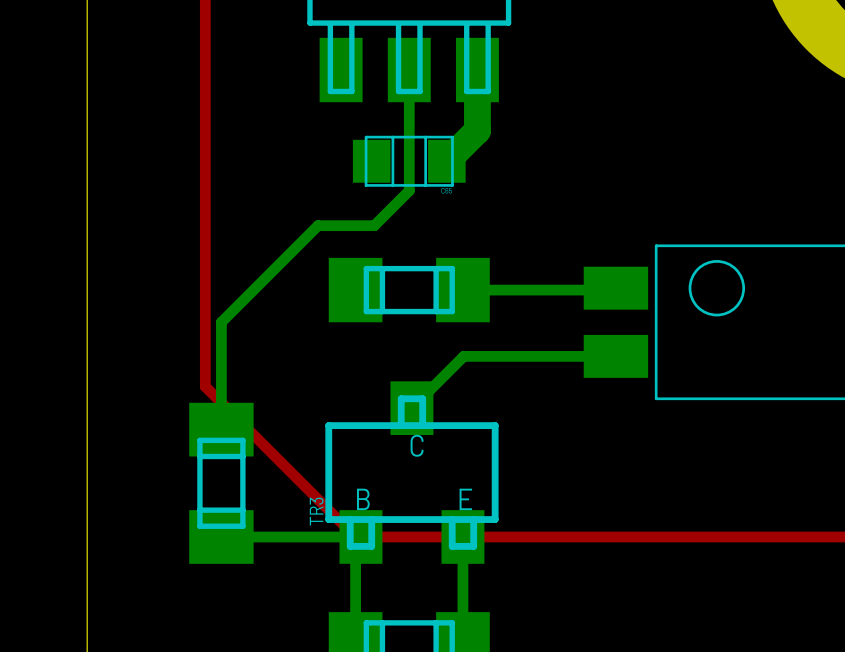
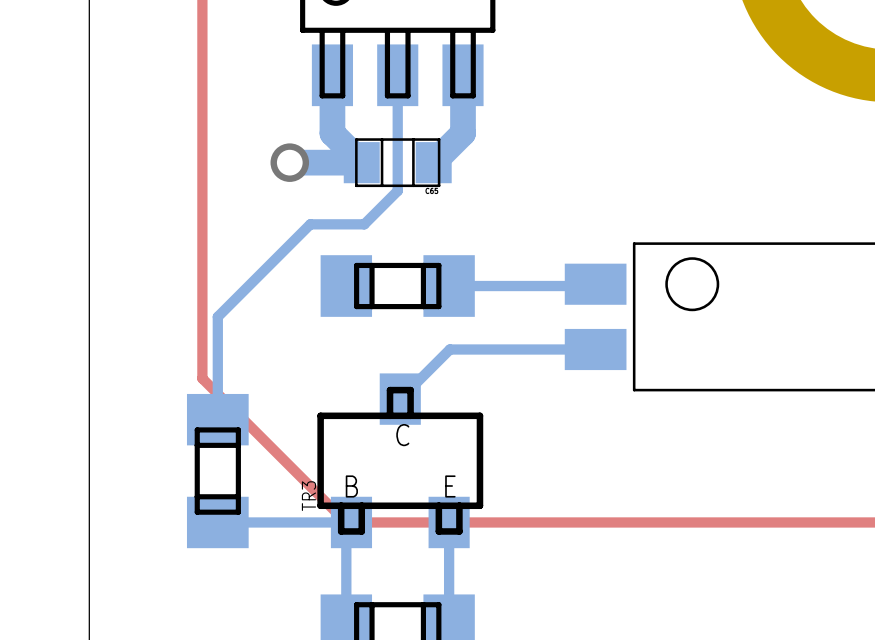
bottom track: none -> (332, 75) (332, 133) (361, 162) (289, 162)
via: none -> (289, 162)

